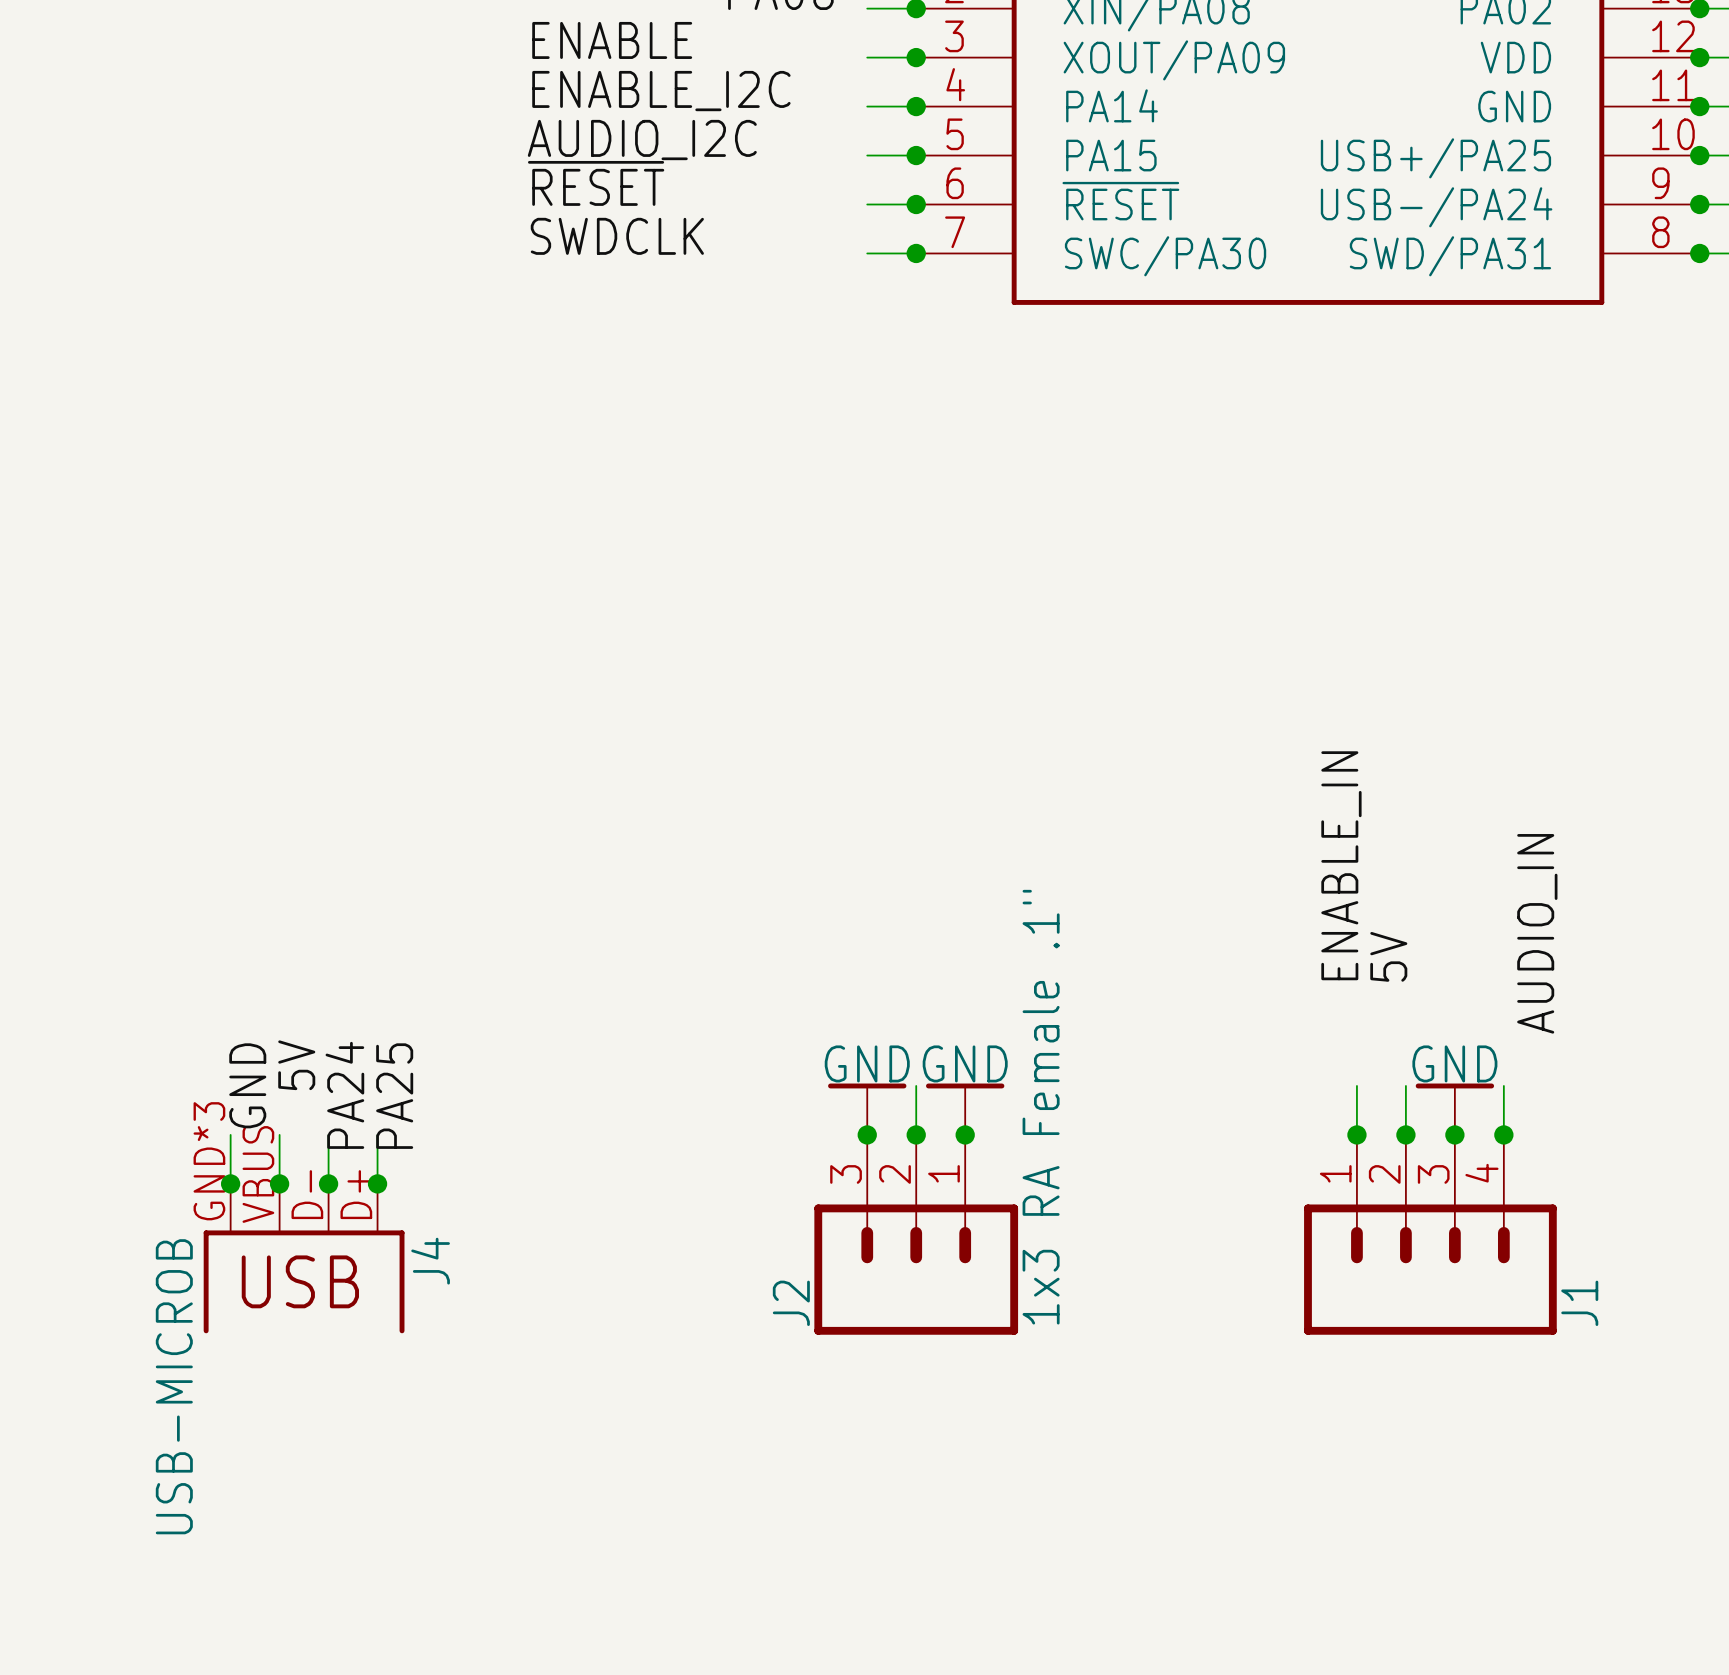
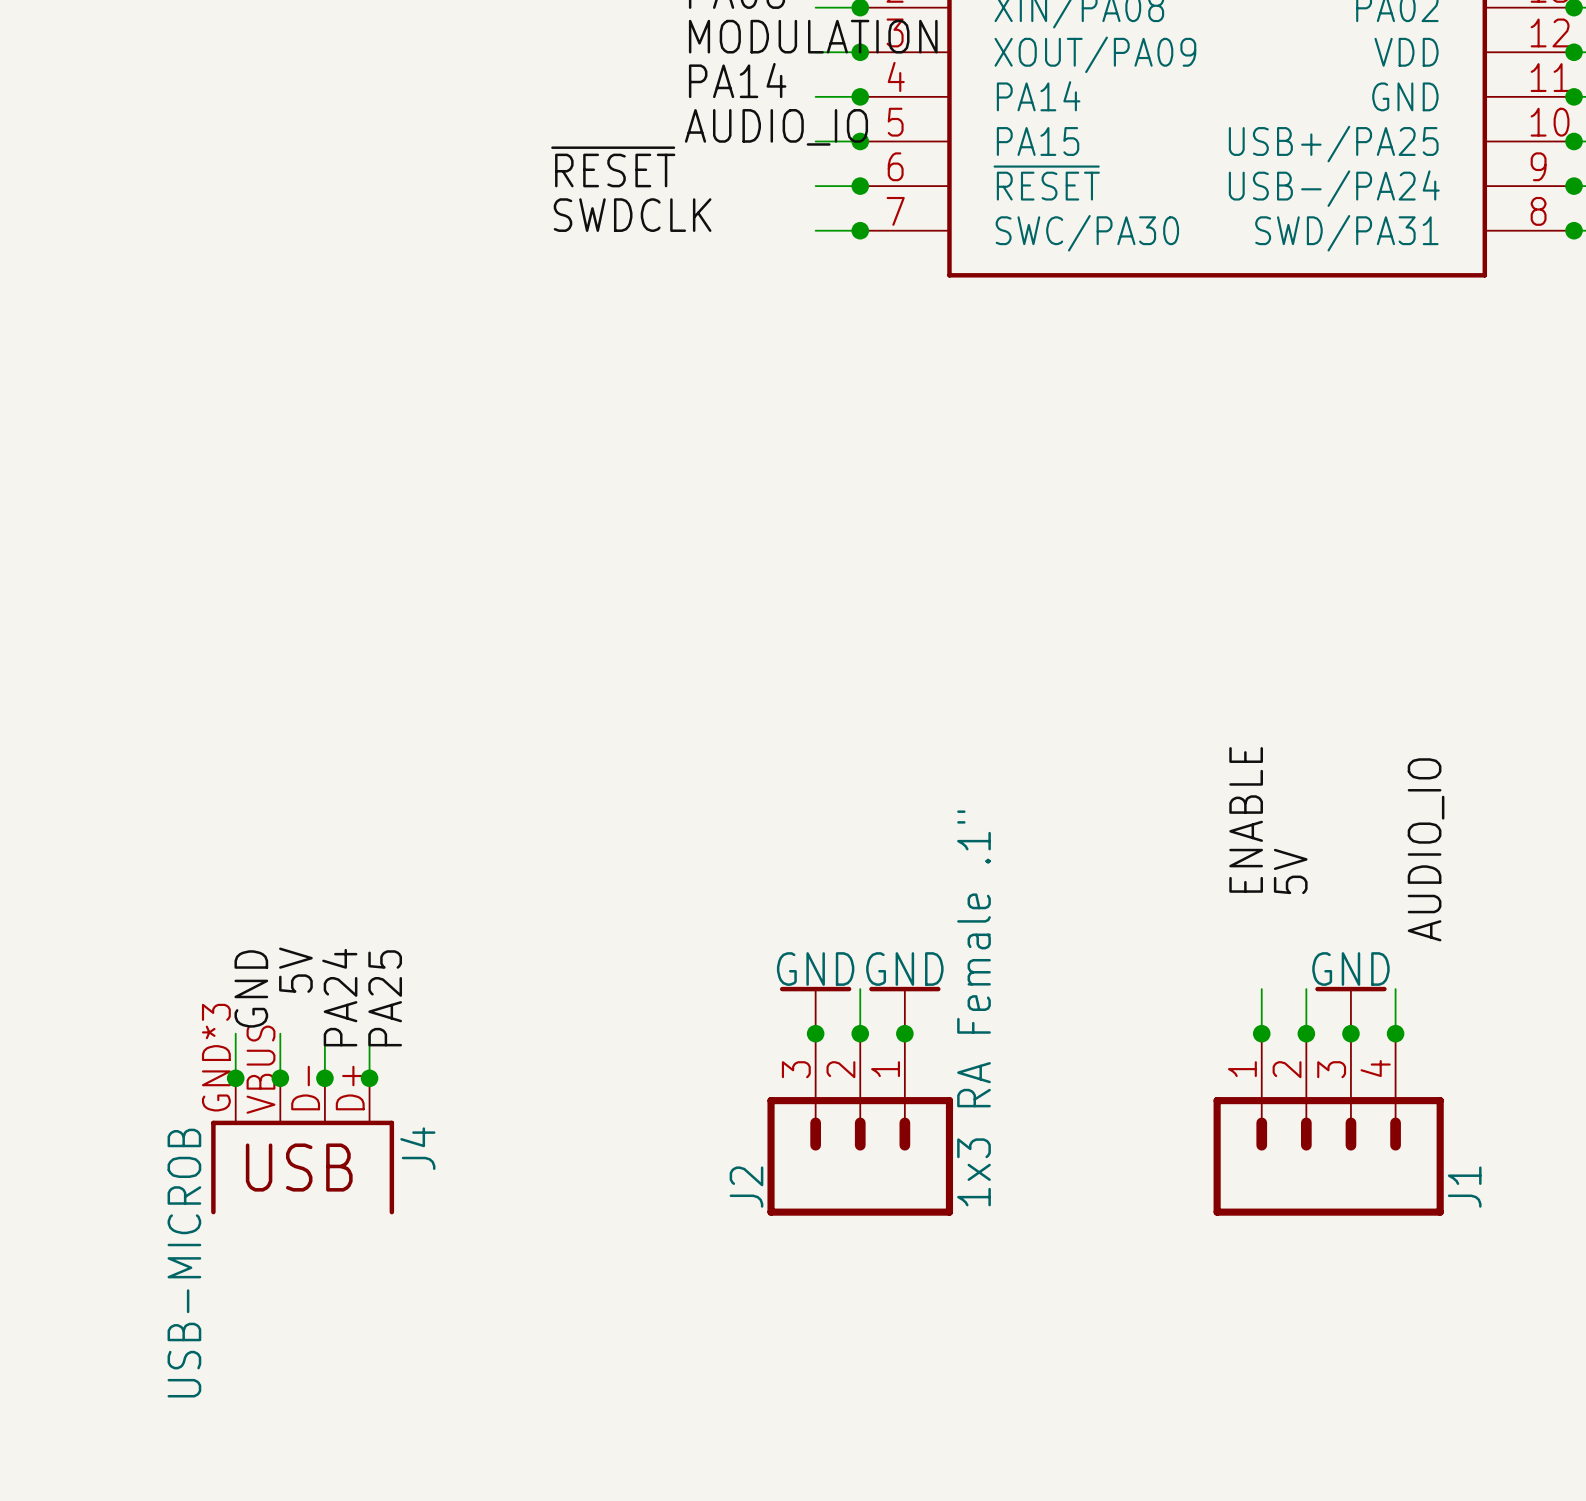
label: ENABLE (612, 40) -> none
label: none -> MODULATION (813, 36)
label: none -> PA14 (737, 80)
label: ENABLE_I2C (661, 91) -> none
label: AUDIO_I2C (642, 140) -> AUDIO_IO (776, 127)
label position: ~{RESET} (596, 183) -> ~{RESET} (613, 166)
label position: SWDCLK (617, 236) -> SWDCLK (632, 215)
label: ENABLE_IN (1341, 865) -> ENABLE (1246, 819)
label: AUDIO_IN (1537, 933) -> AUDIO_IO (1426, 849)

